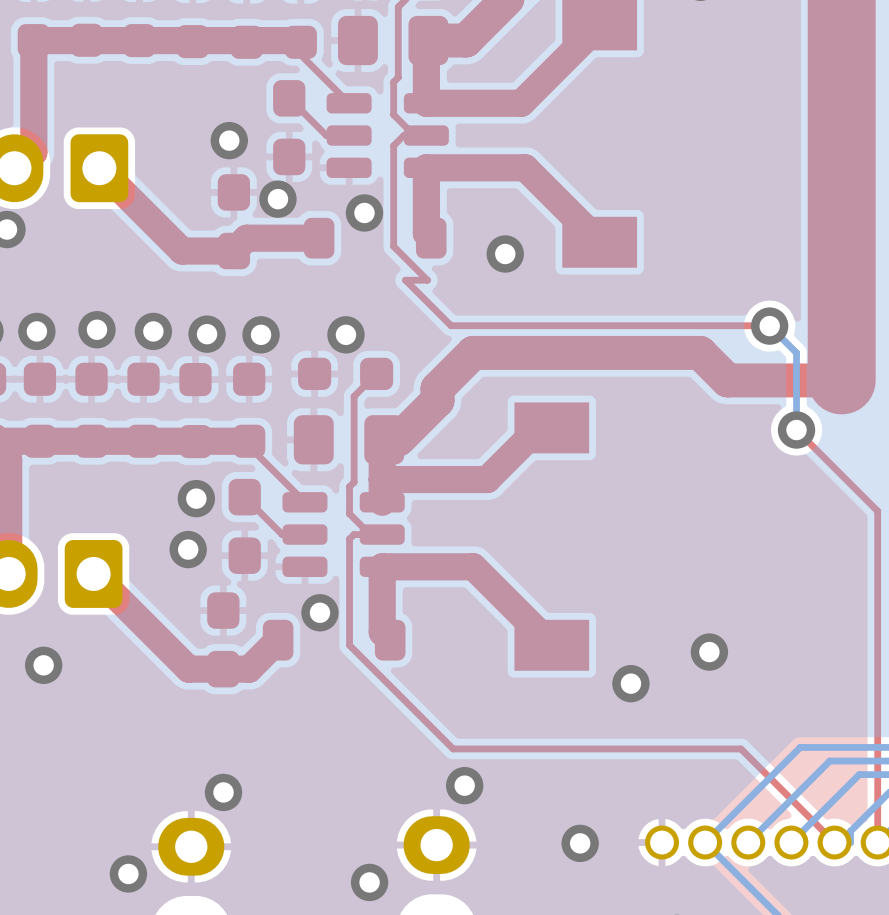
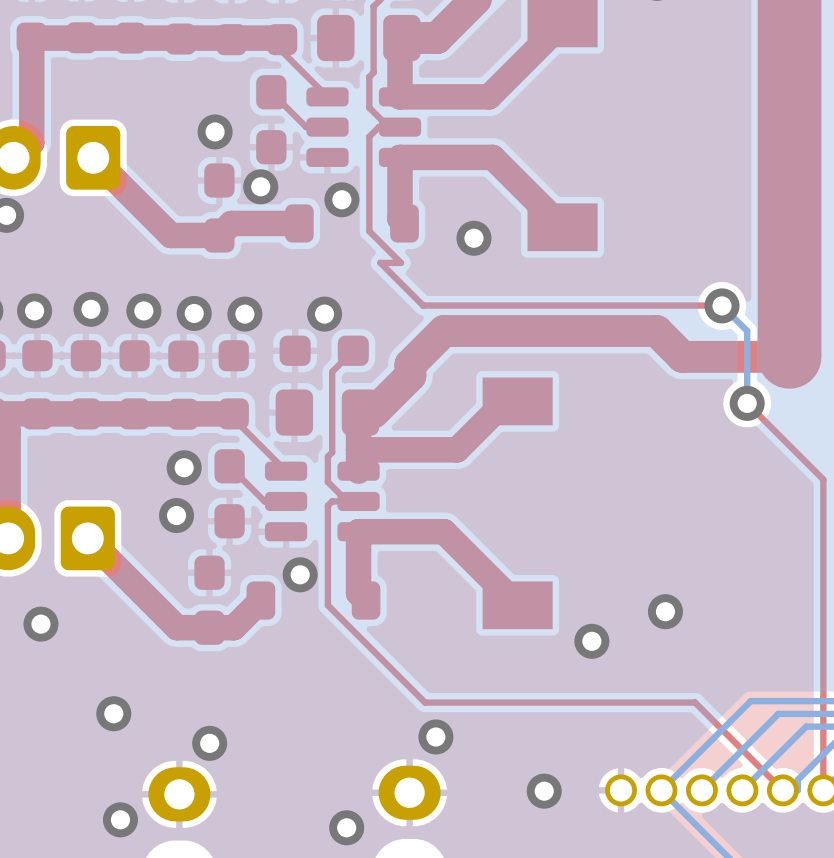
via: none -> (113, 713)

